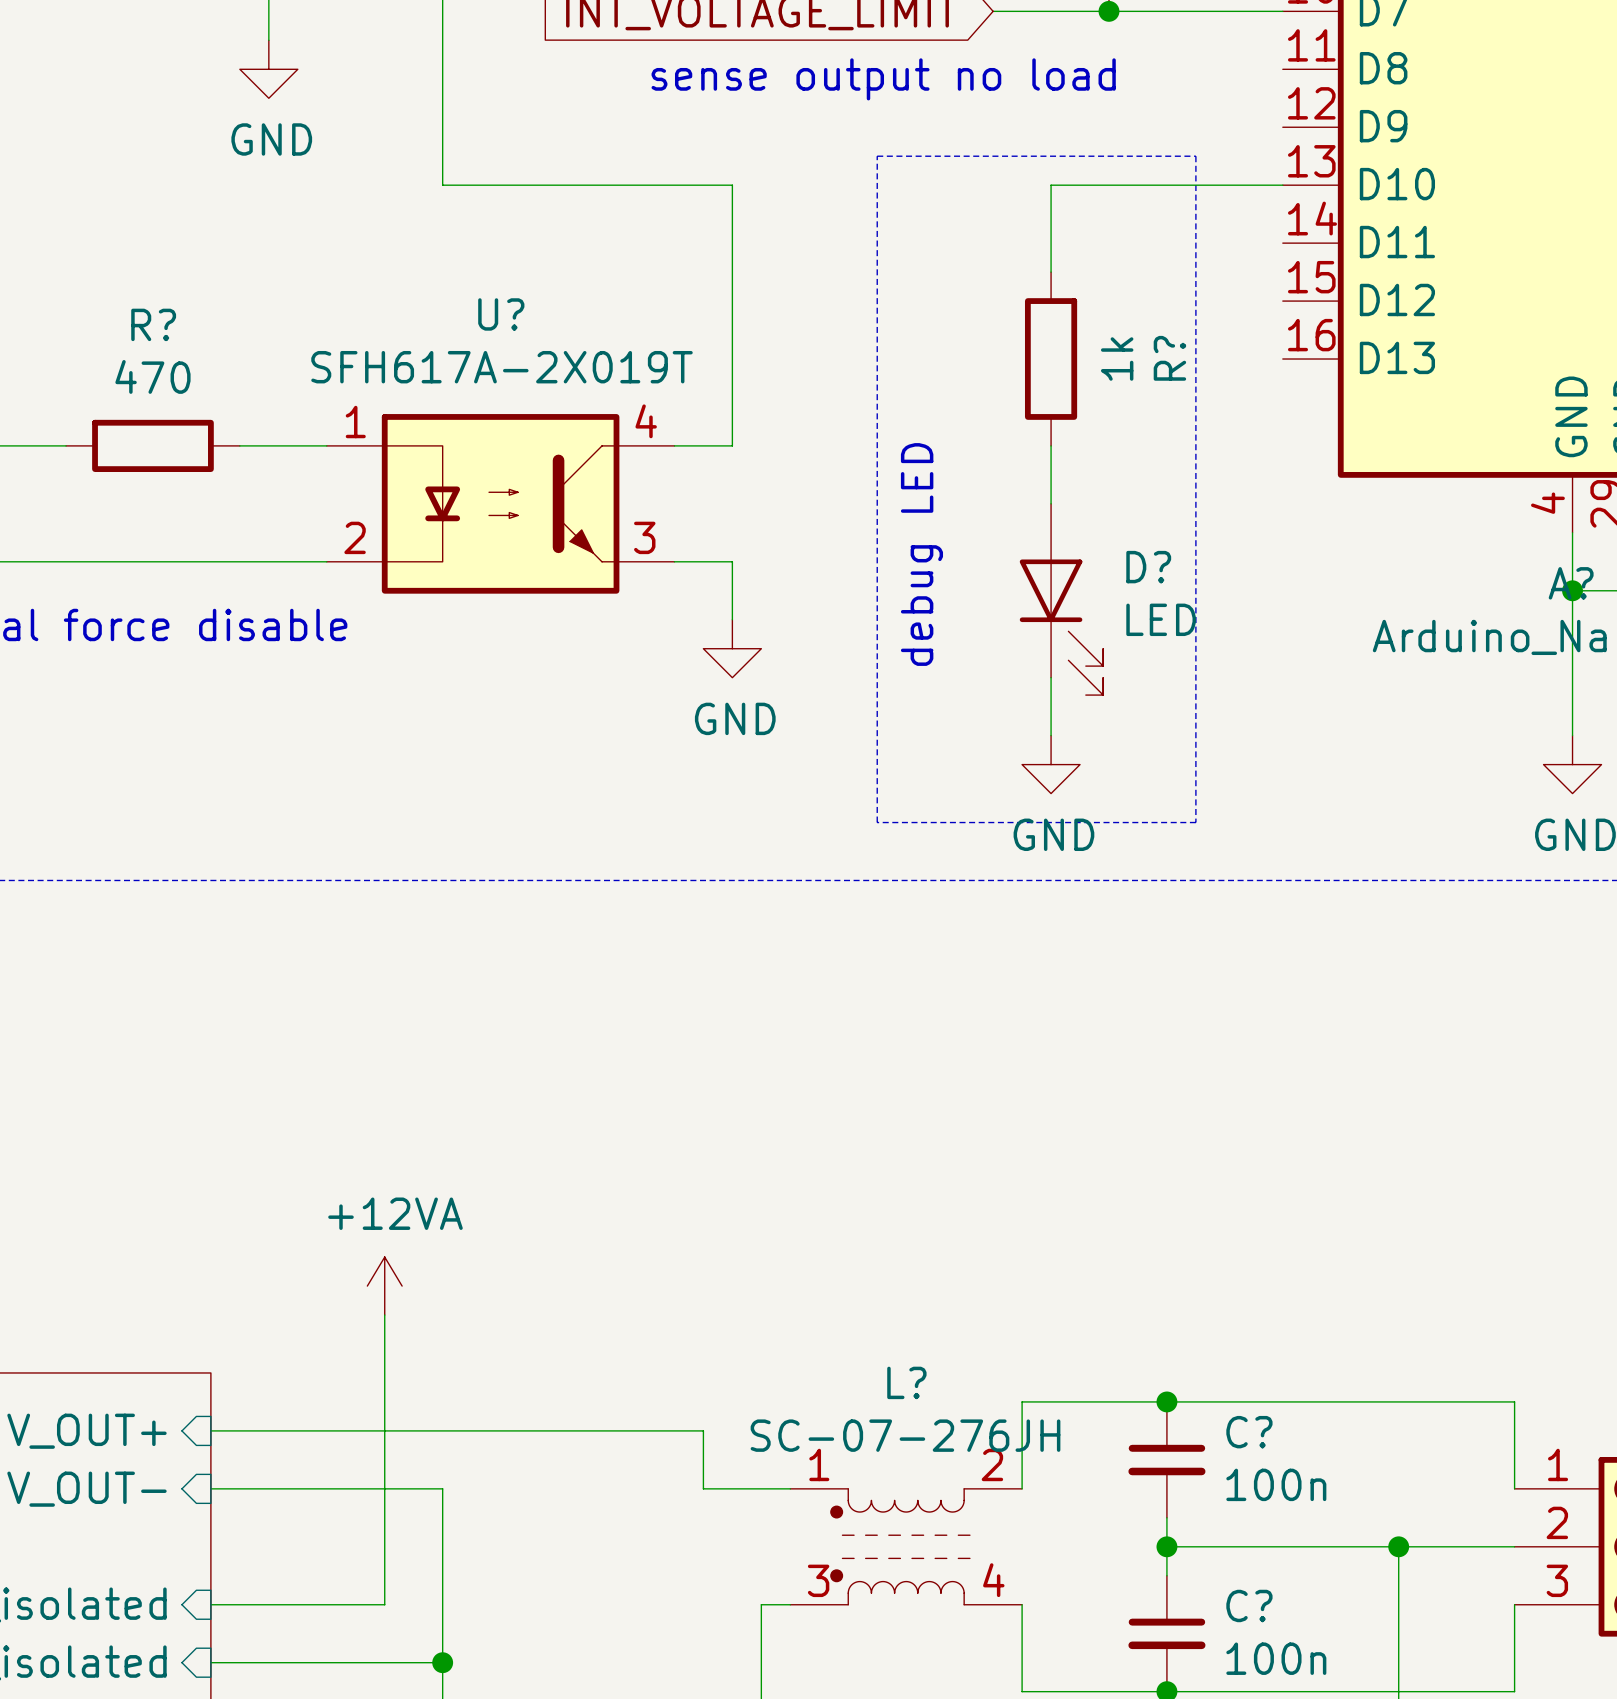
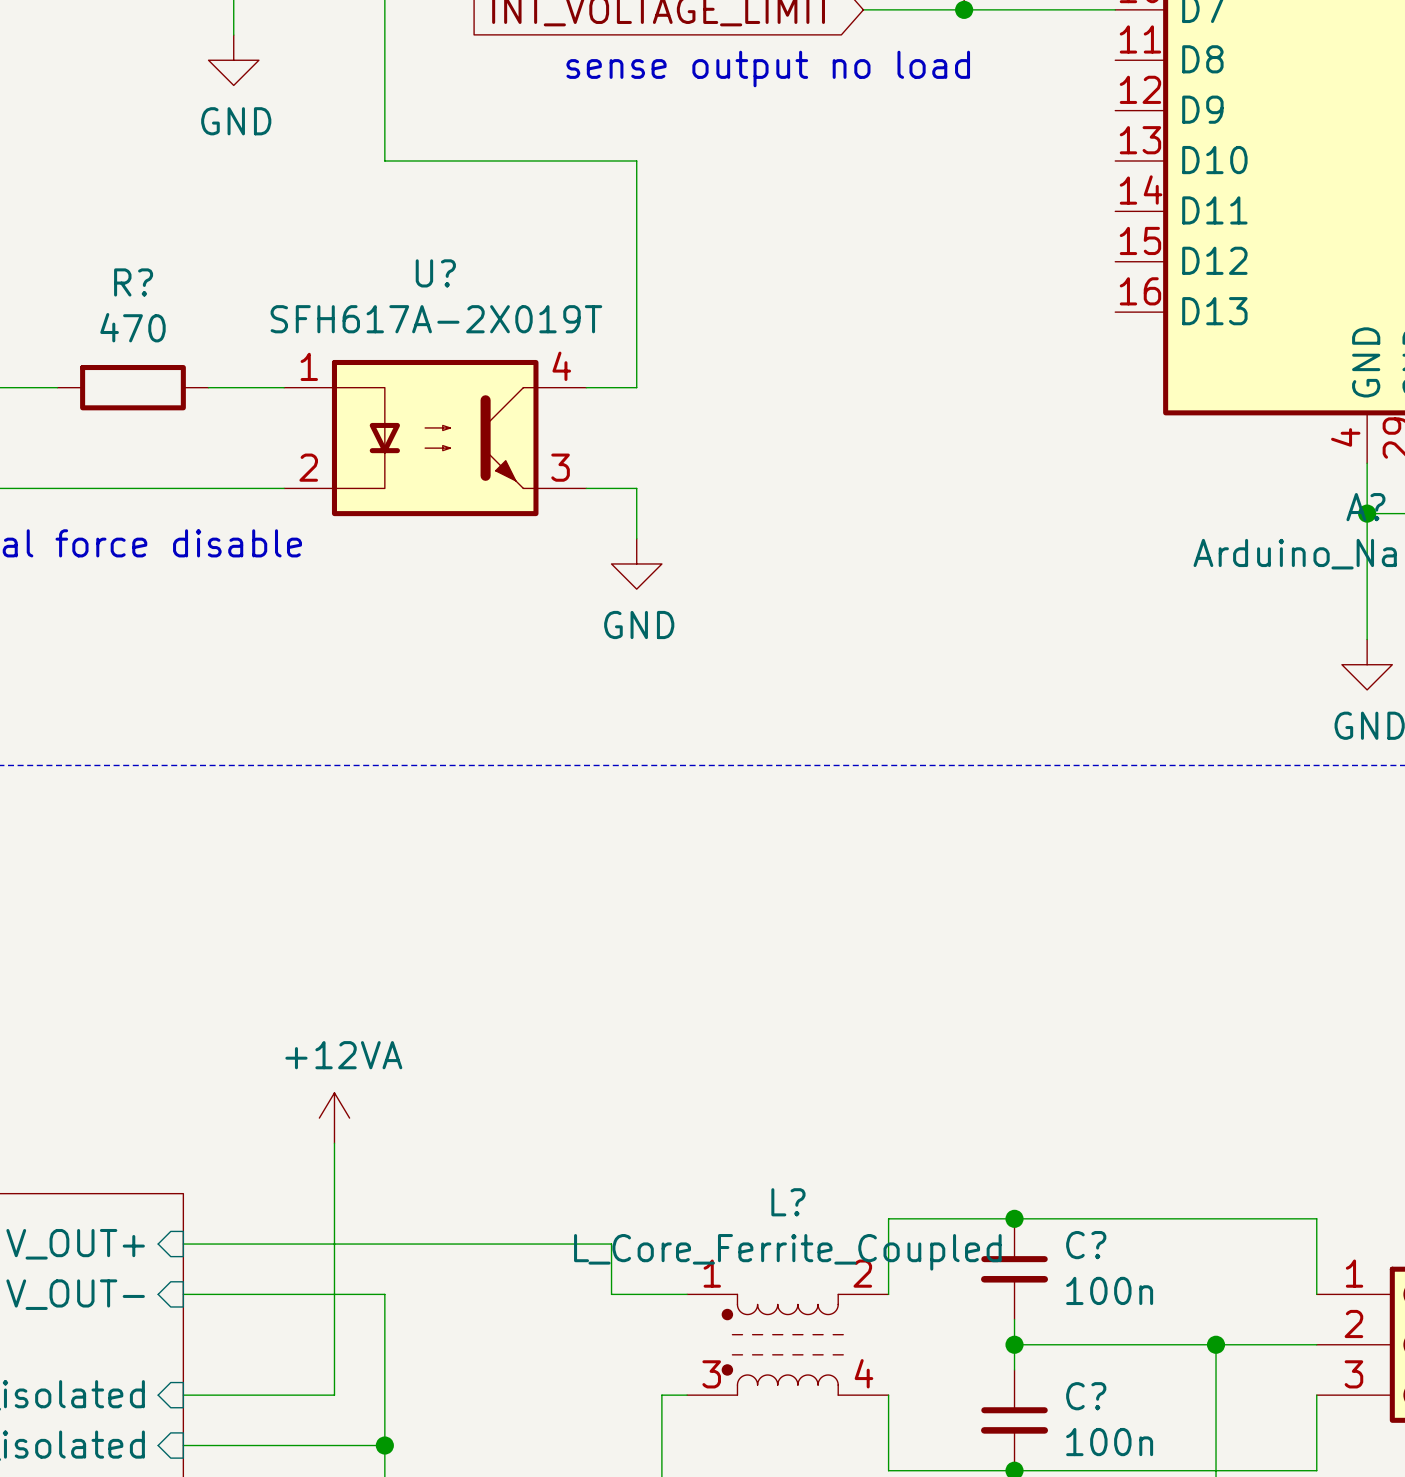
line: (877, 156) (1195, 156) (1195, 822) (877, 822) (877, 156) -> none
wire: (1282, 185) (1051, 185) (1051, 272) -> none
R?: 1k (1051, 359) -> none
wire: (1051, 445) (1051, 503) -> none
text: debug LED (921, 554) -> none
D?: LED (1061, 599) -> none
wire: (1051, 677) (1051, 735) -> none
power symbol: GND (1051, 764) -> none
L? value: SC-07-276JH (905, 1435) -> L_Core_Ferrite_Coupled (787, 1252)

